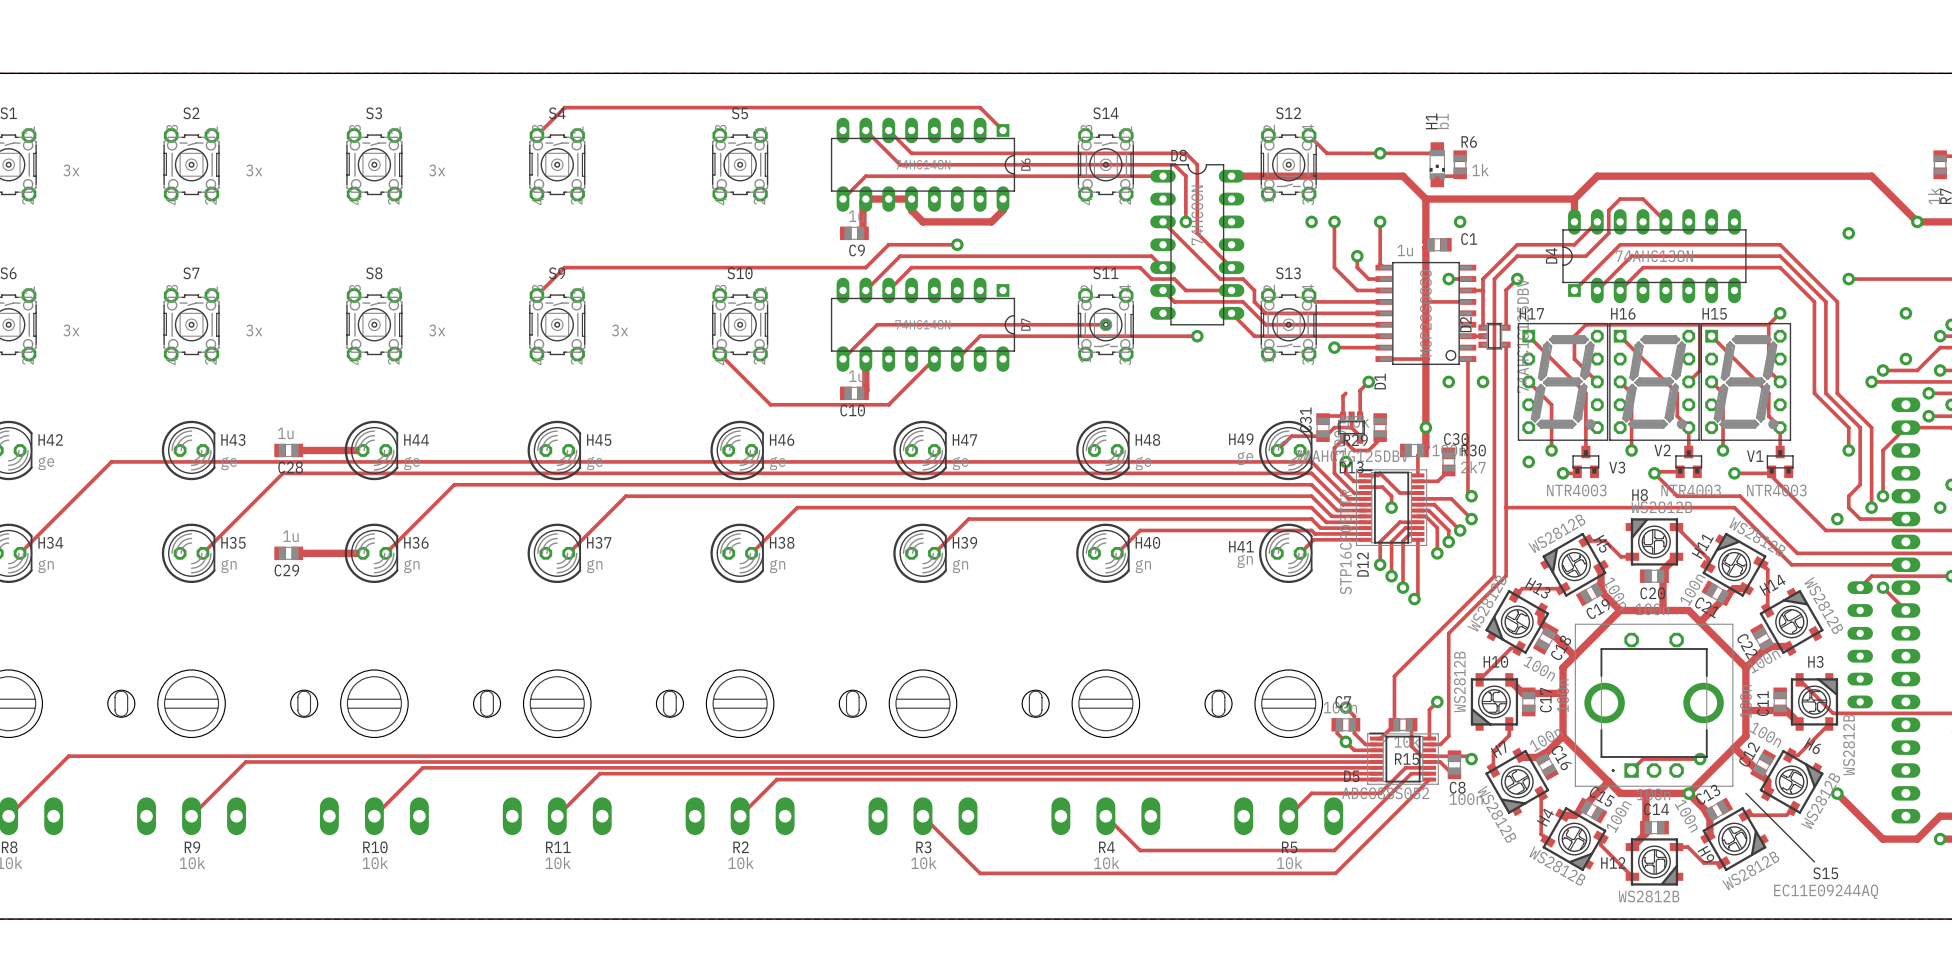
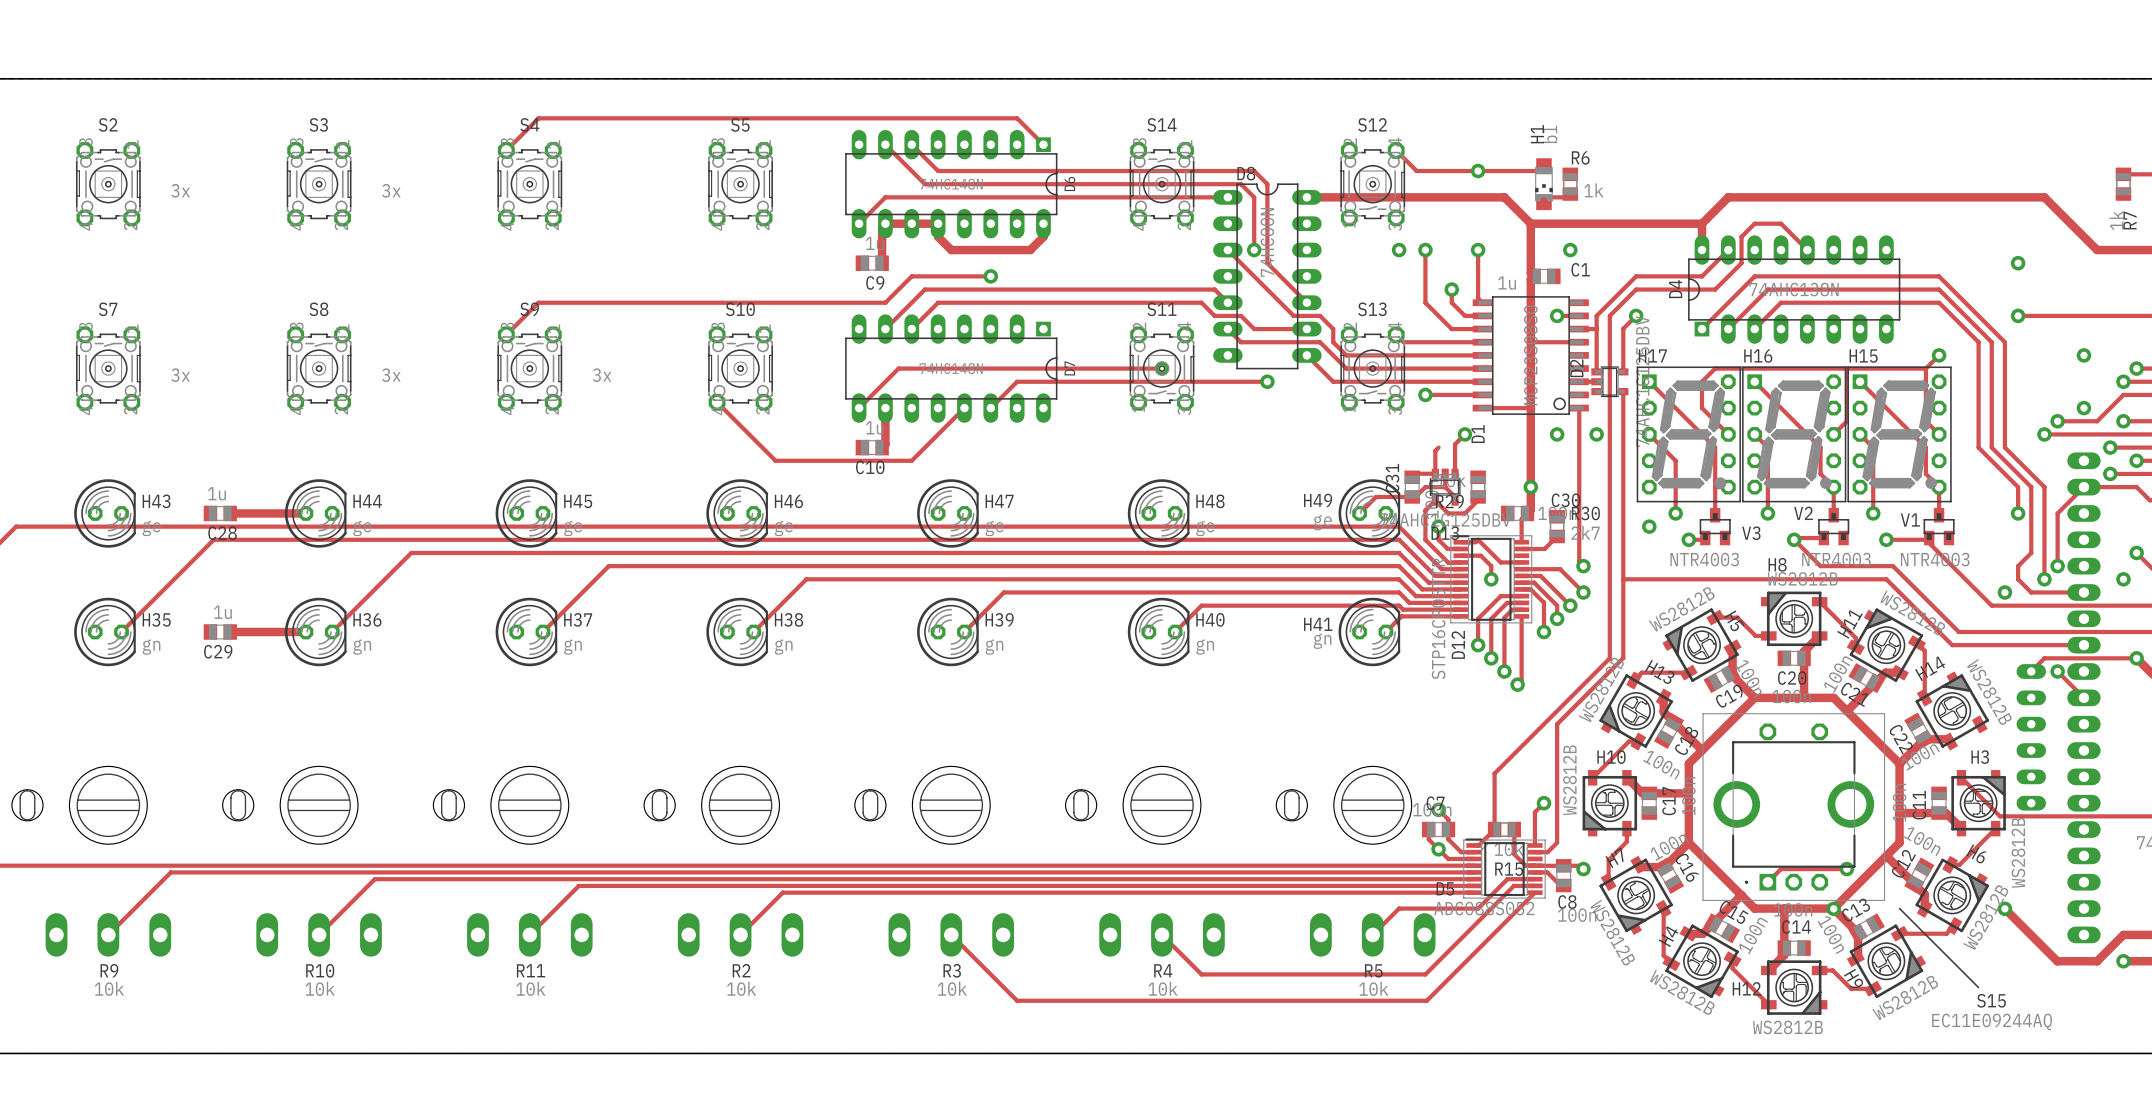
via: (1917, 221) -> none

